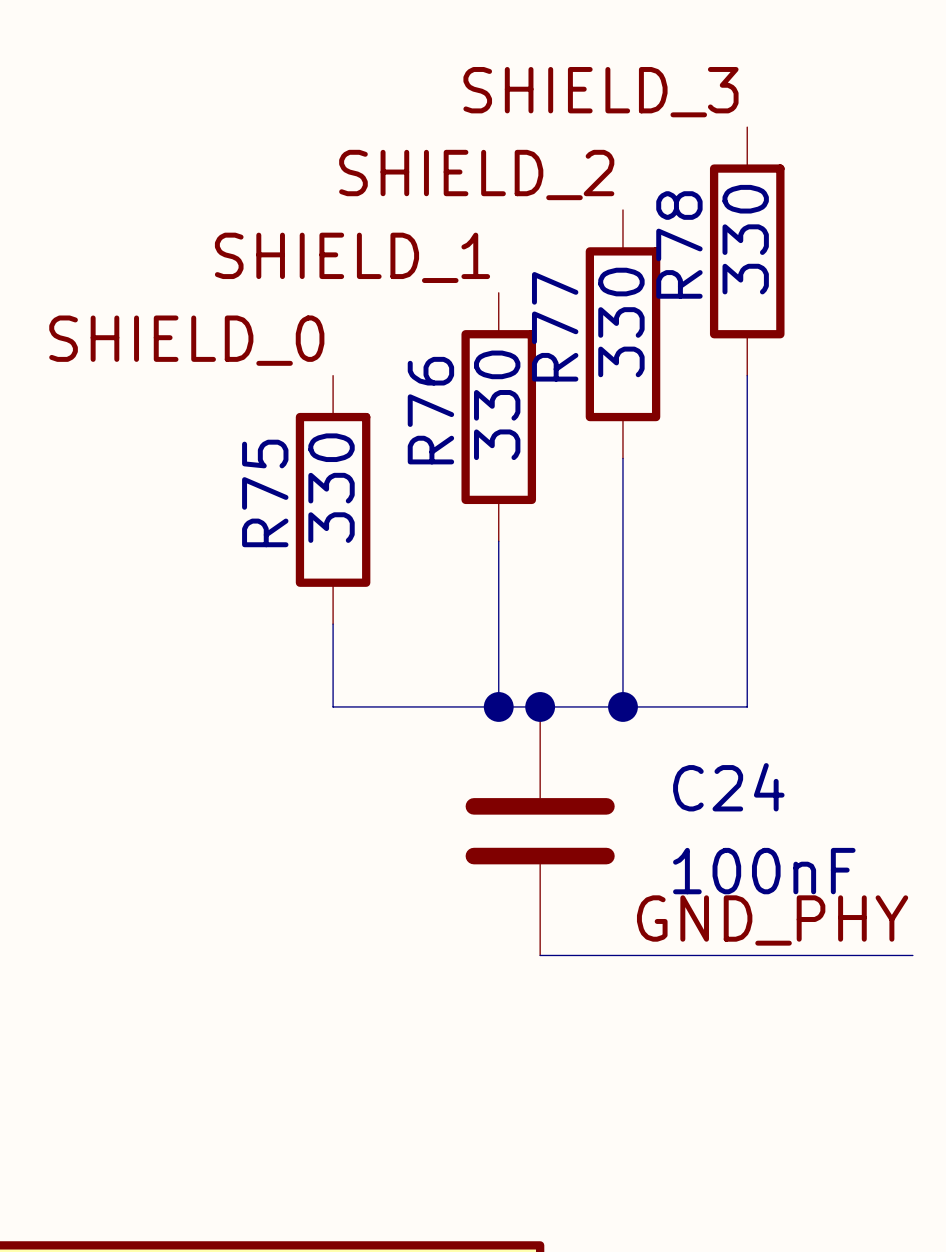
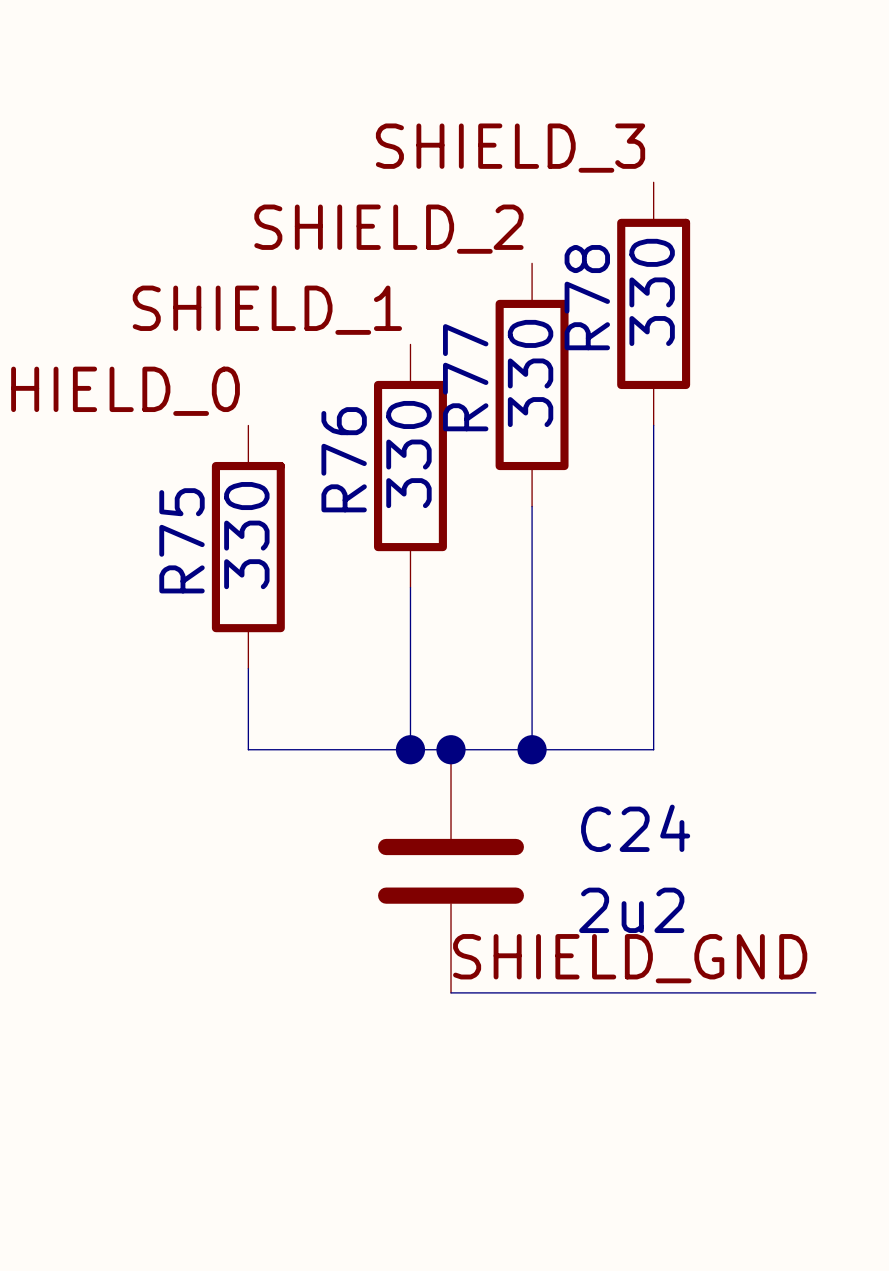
C24 value: 100nF (764, 871) -> 2u2 (631, 910)
label: GND_PHY (772, 920) -> SHIELD_GND (630, 958)

